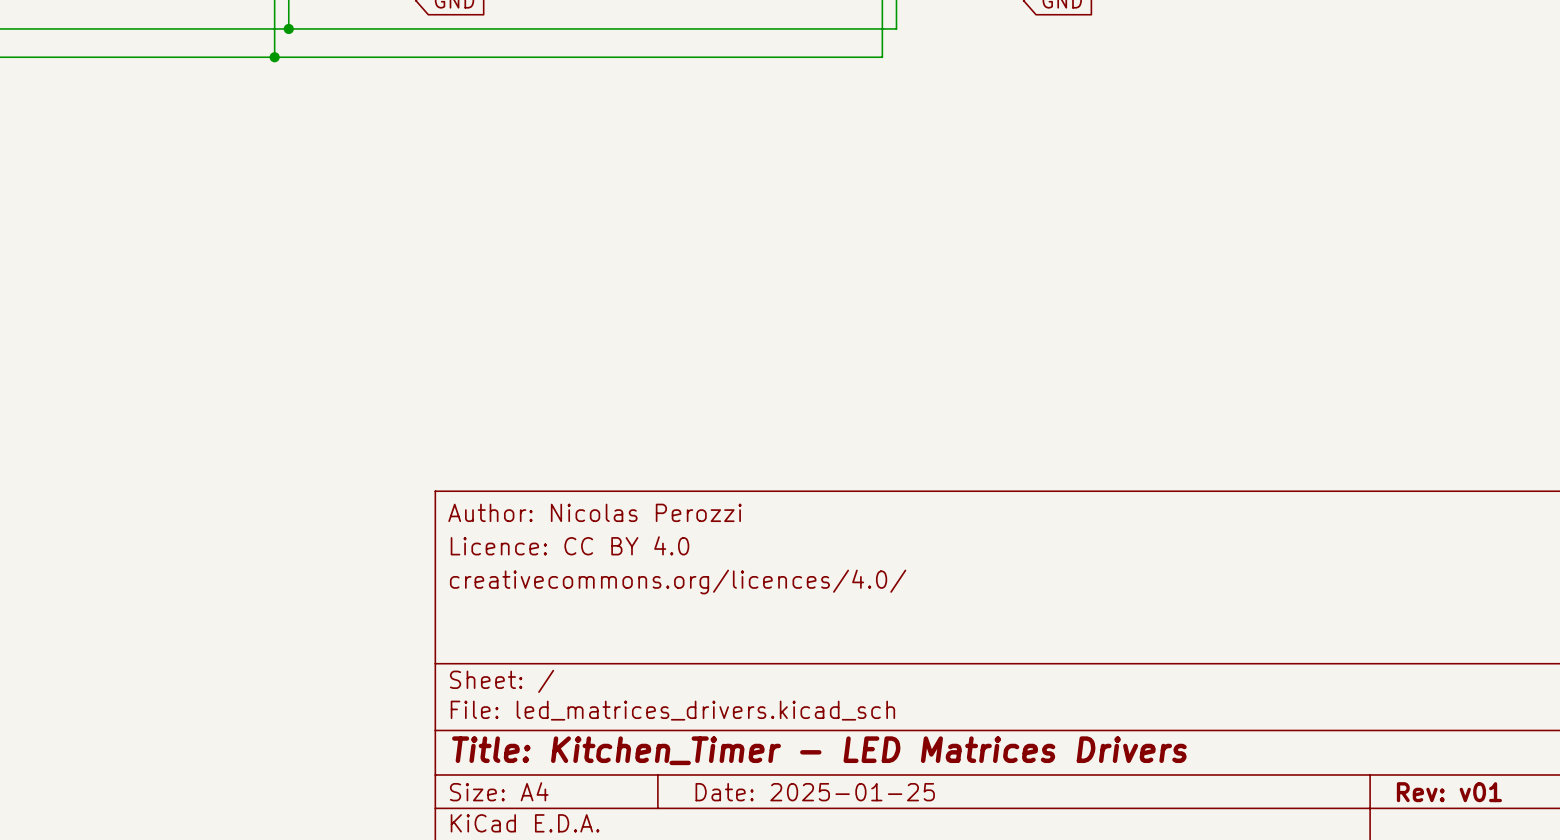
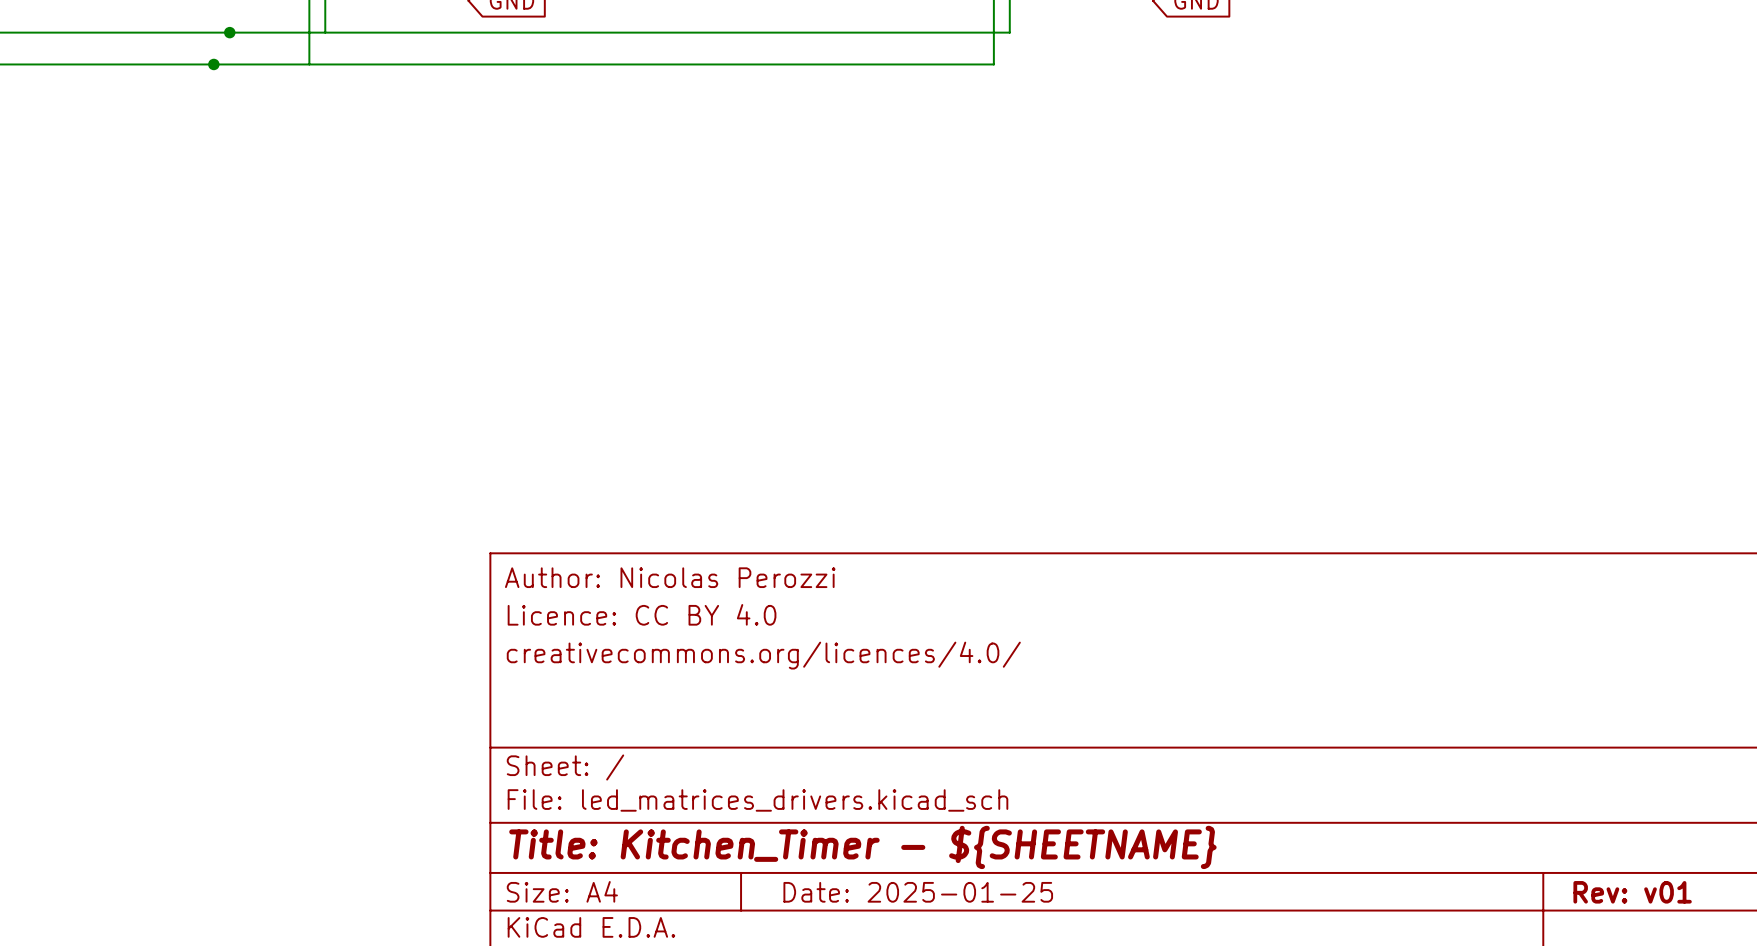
junction: none -> (229, 32)
junction: (288, 28) -> none
junction: none -> (213, 64)
junction: (274, 57) -> none
title block: Title: Kitchen_Timer - LED Matrices Drivers (819, 750) -> Title: Kitchen_Timer - ${SHEETNAME} (862, 847)

